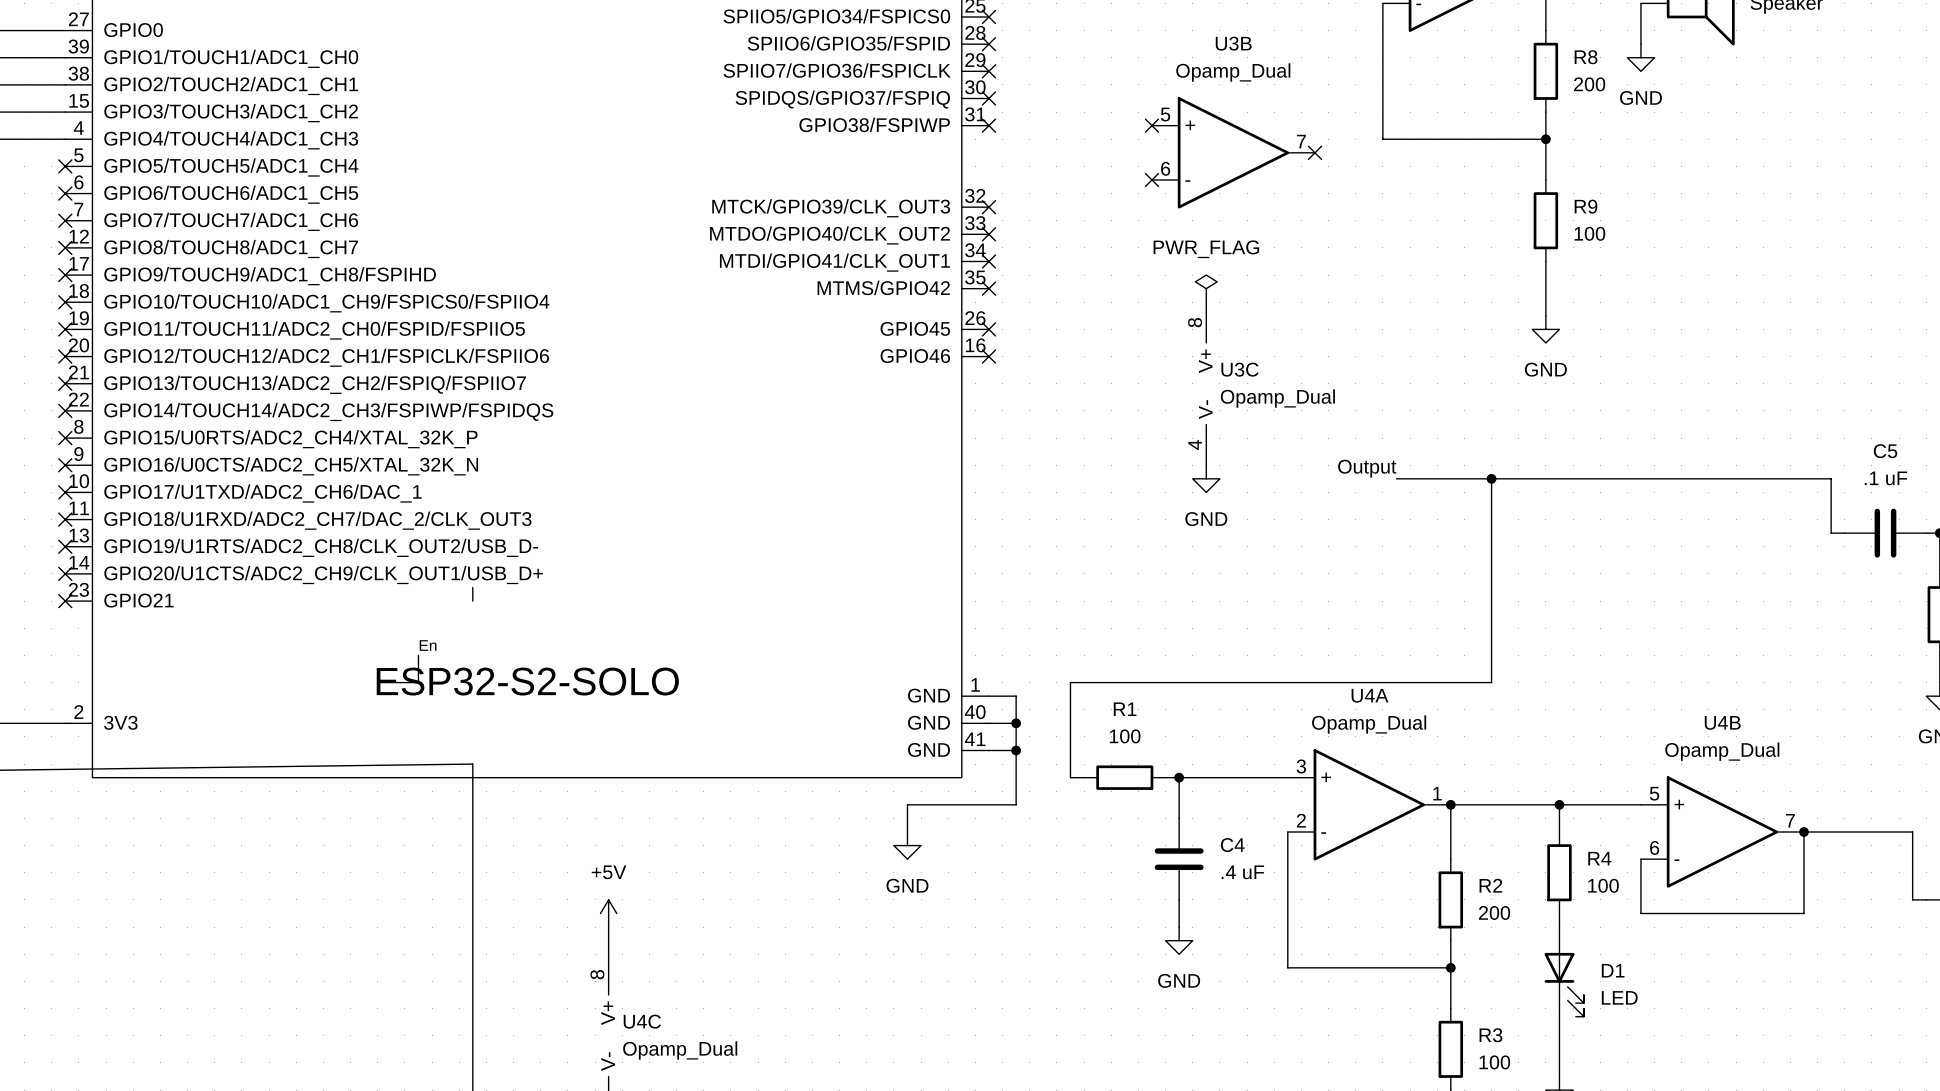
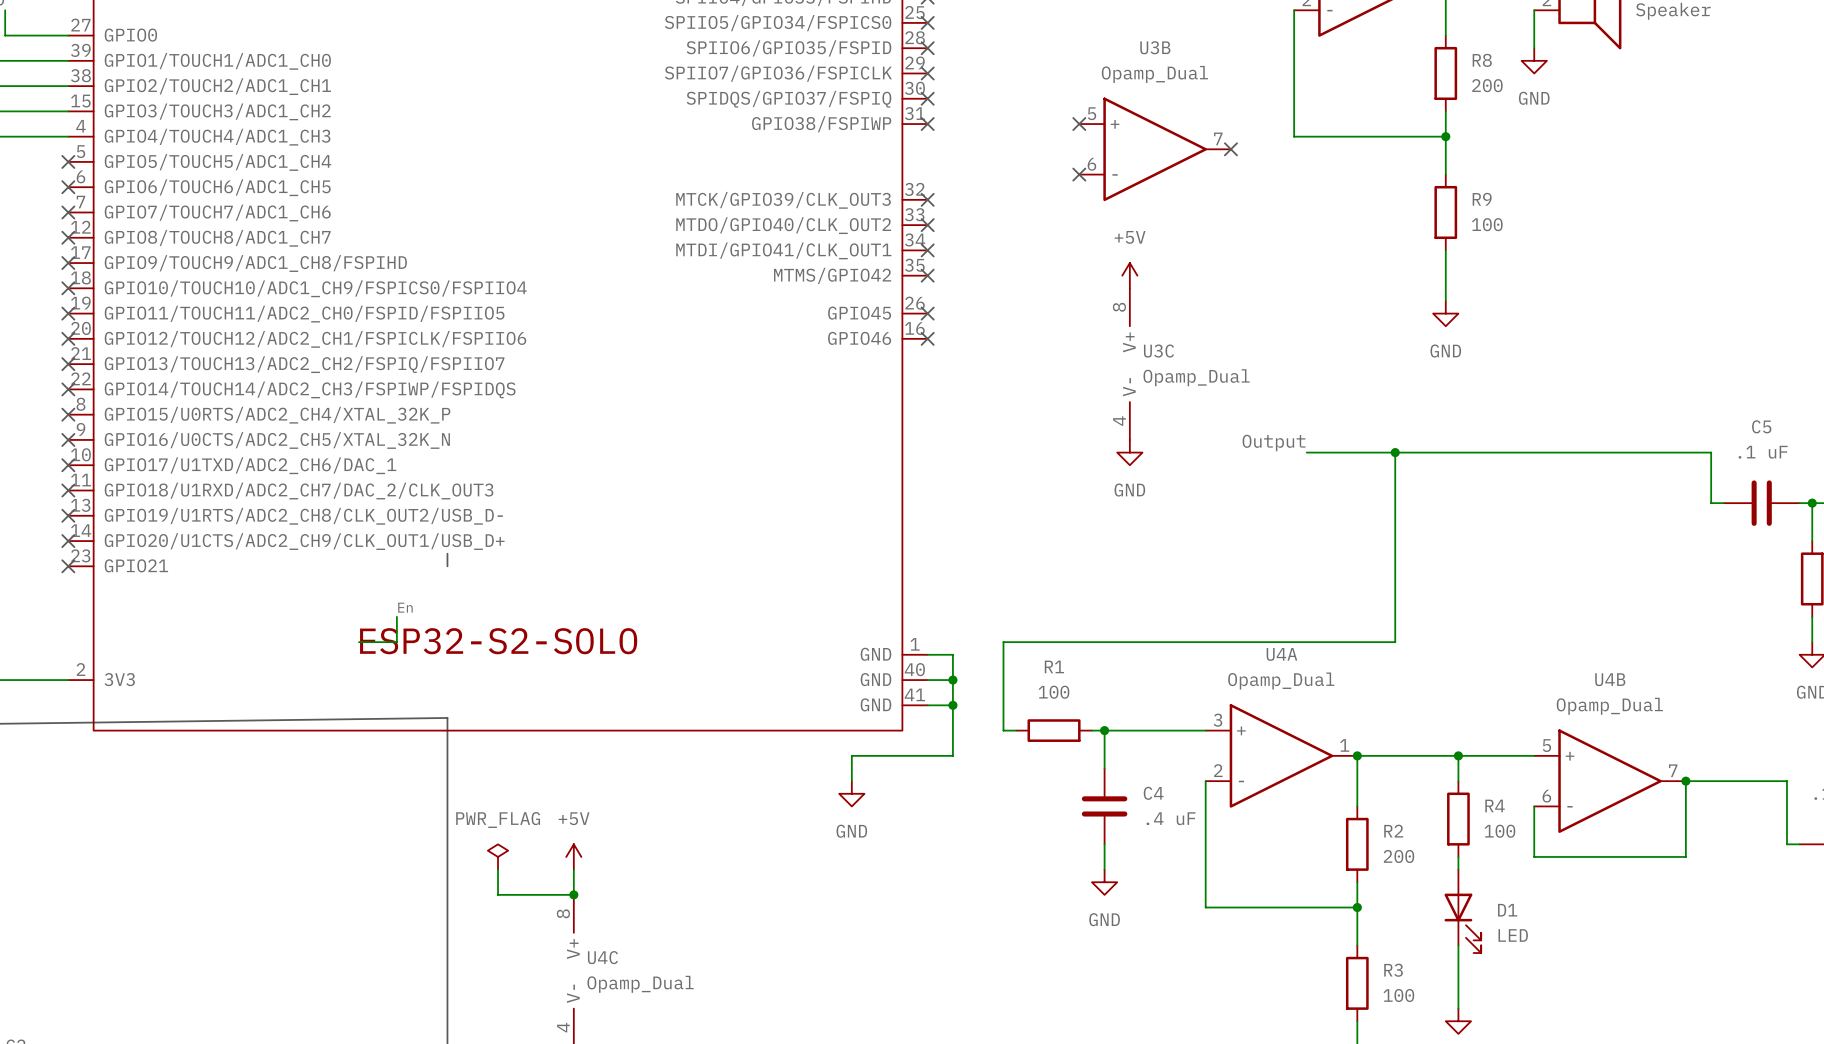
power symbol: PWR_FLAG (1206, 288) -> +5V (1129, 275)
power symbol: none -> PWR_FLAG (498, 856)
wire: none -> (498, 869) (498, 894) (573, 894)
junction: none -> (573, 894)

